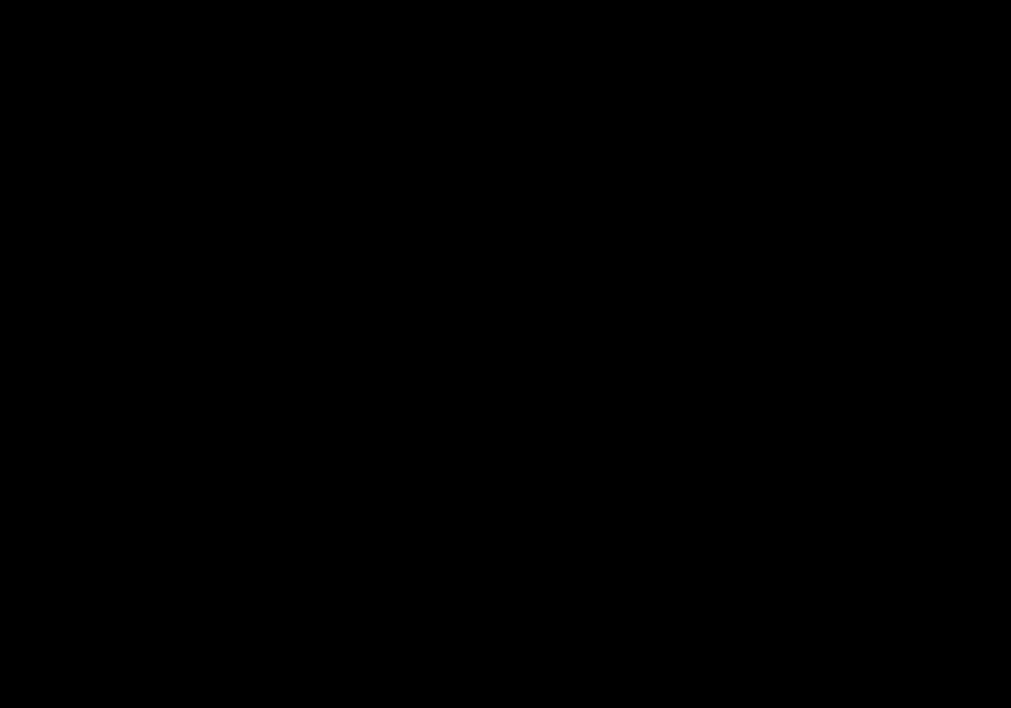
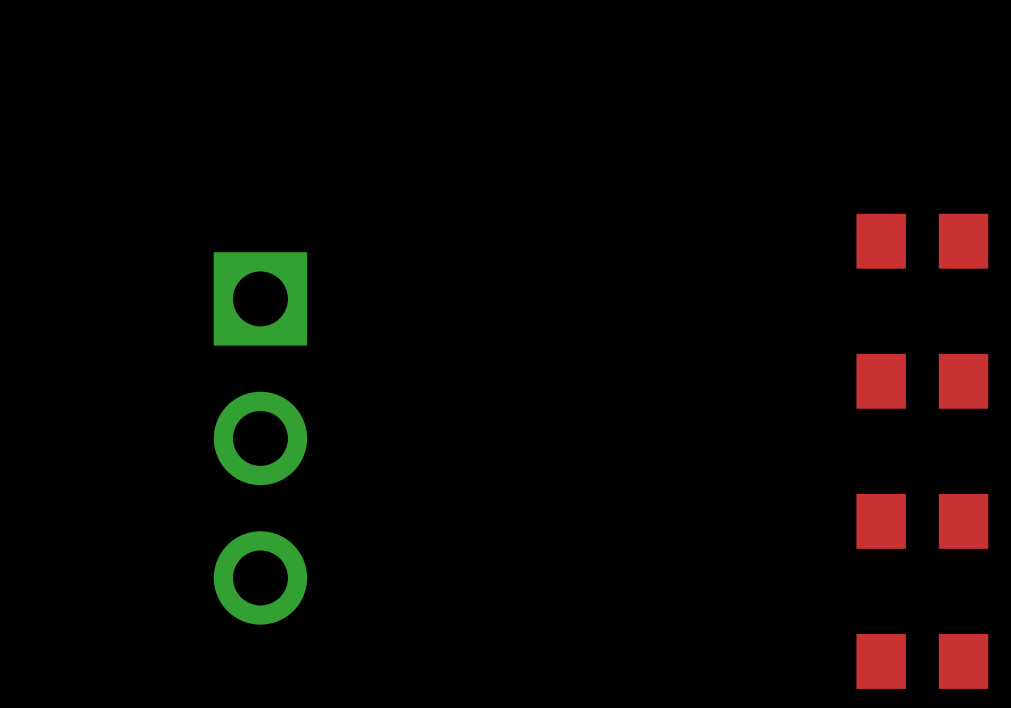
part: none -> (922, 241)
part: none -> (922, 381)
part: none -> (260, 438)
part: none -> (922, 521)
part: none -> (922, 661)

